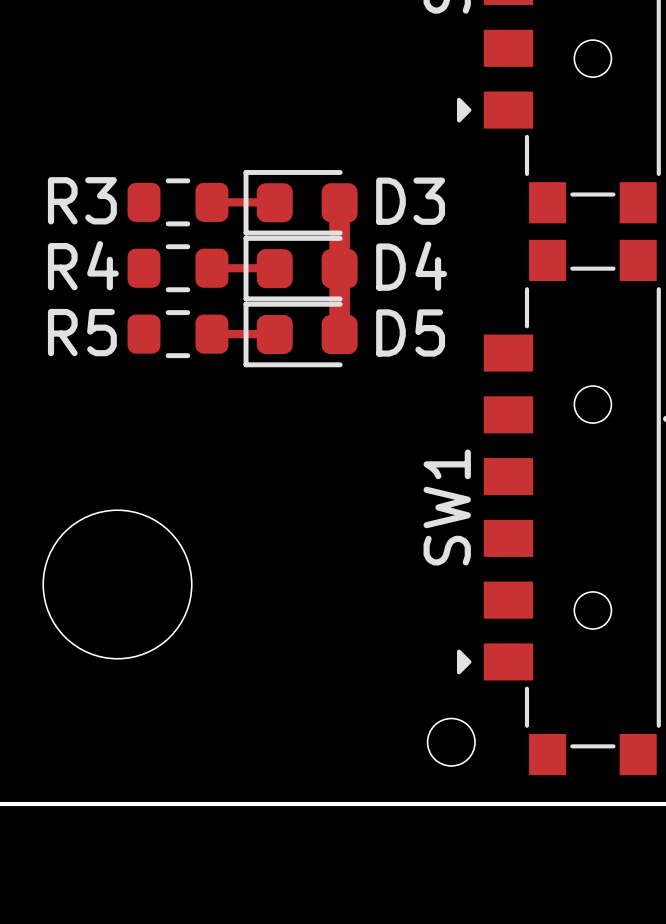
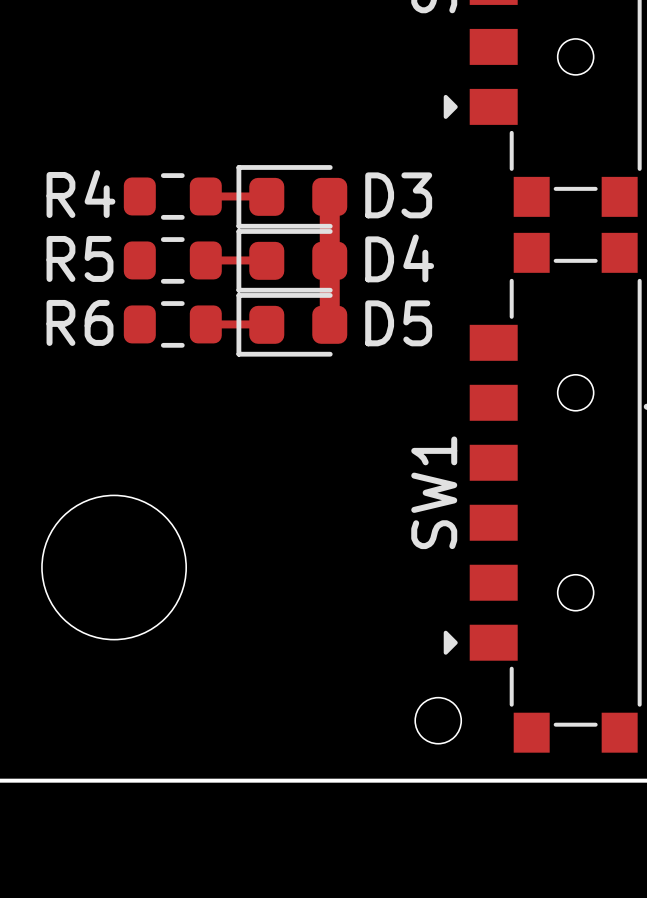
R3 name: R3 (82, 200) -> R4 (80, 194)
R4 name: R4 (83, 265) -> R5 (80, 258)
R5 name: R5 (82, 332) -> R6 (80, 322)

